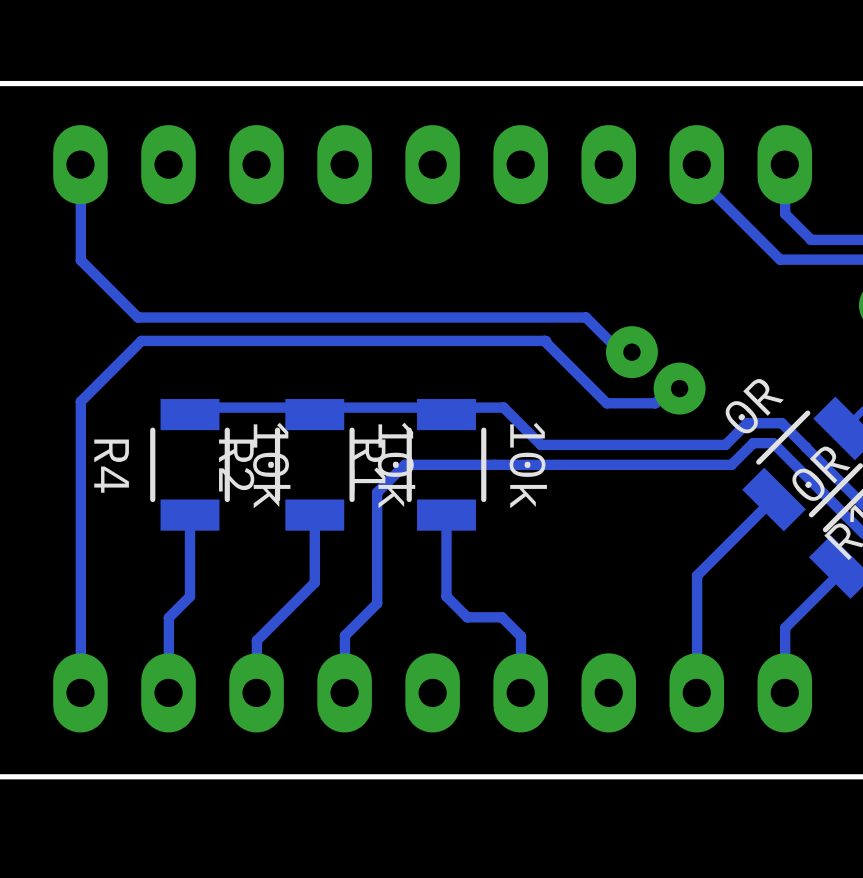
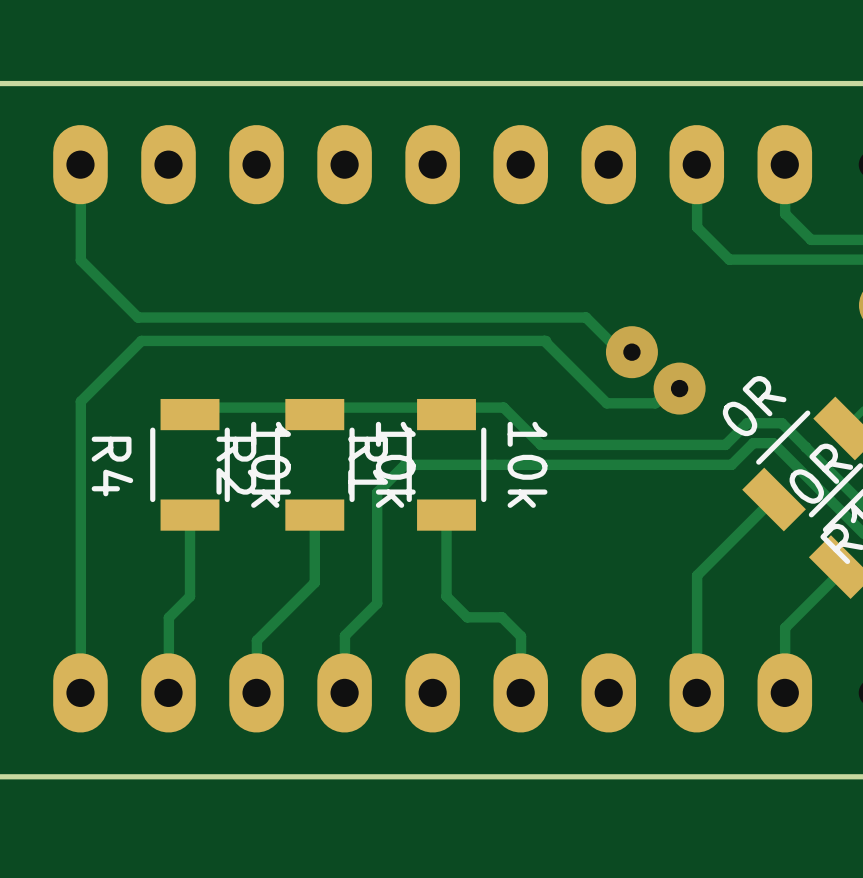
track: (697, 176) (780, 259) -> (697, 176) (697, 227) (729, 259) (780, 259)

